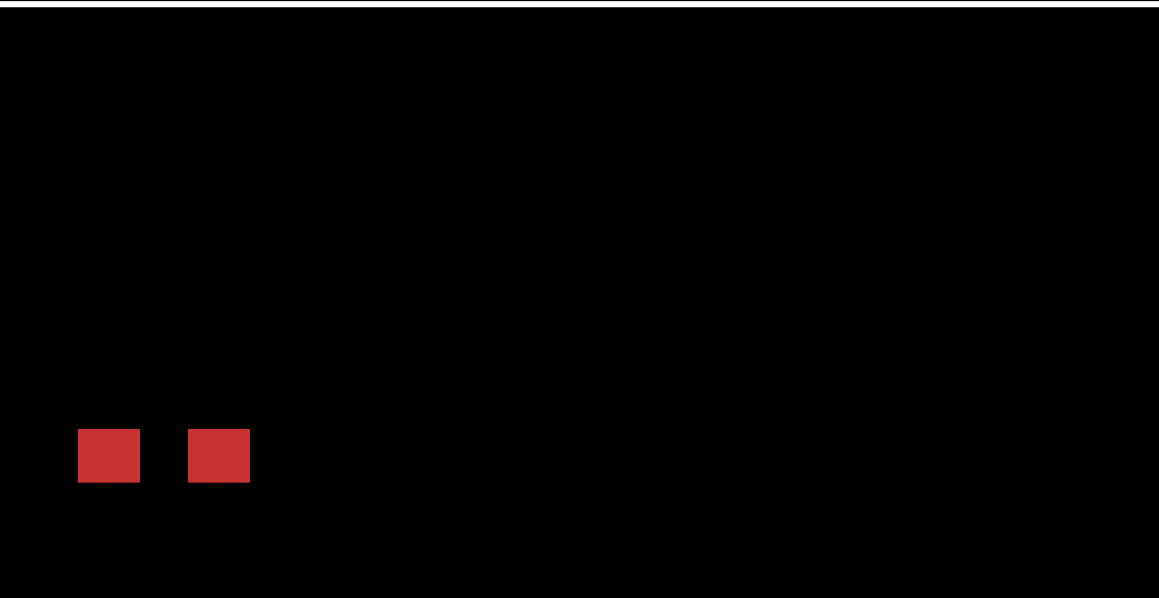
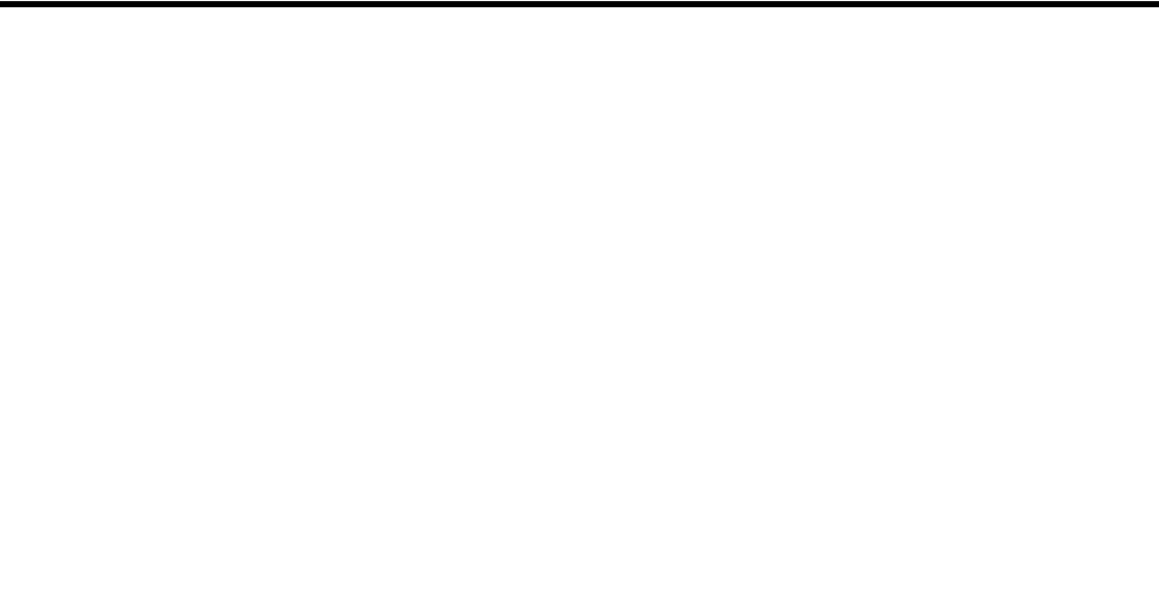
part: (163, 455) -> none

